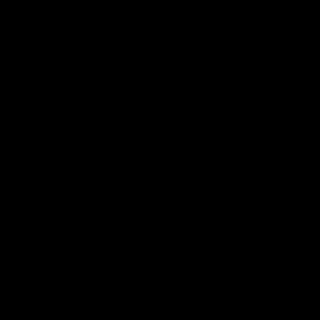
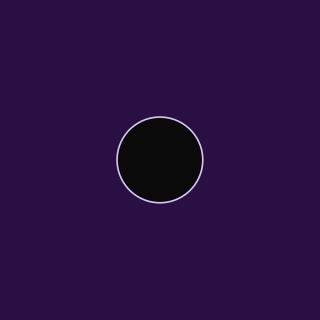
hole: none -> (159, 159)

